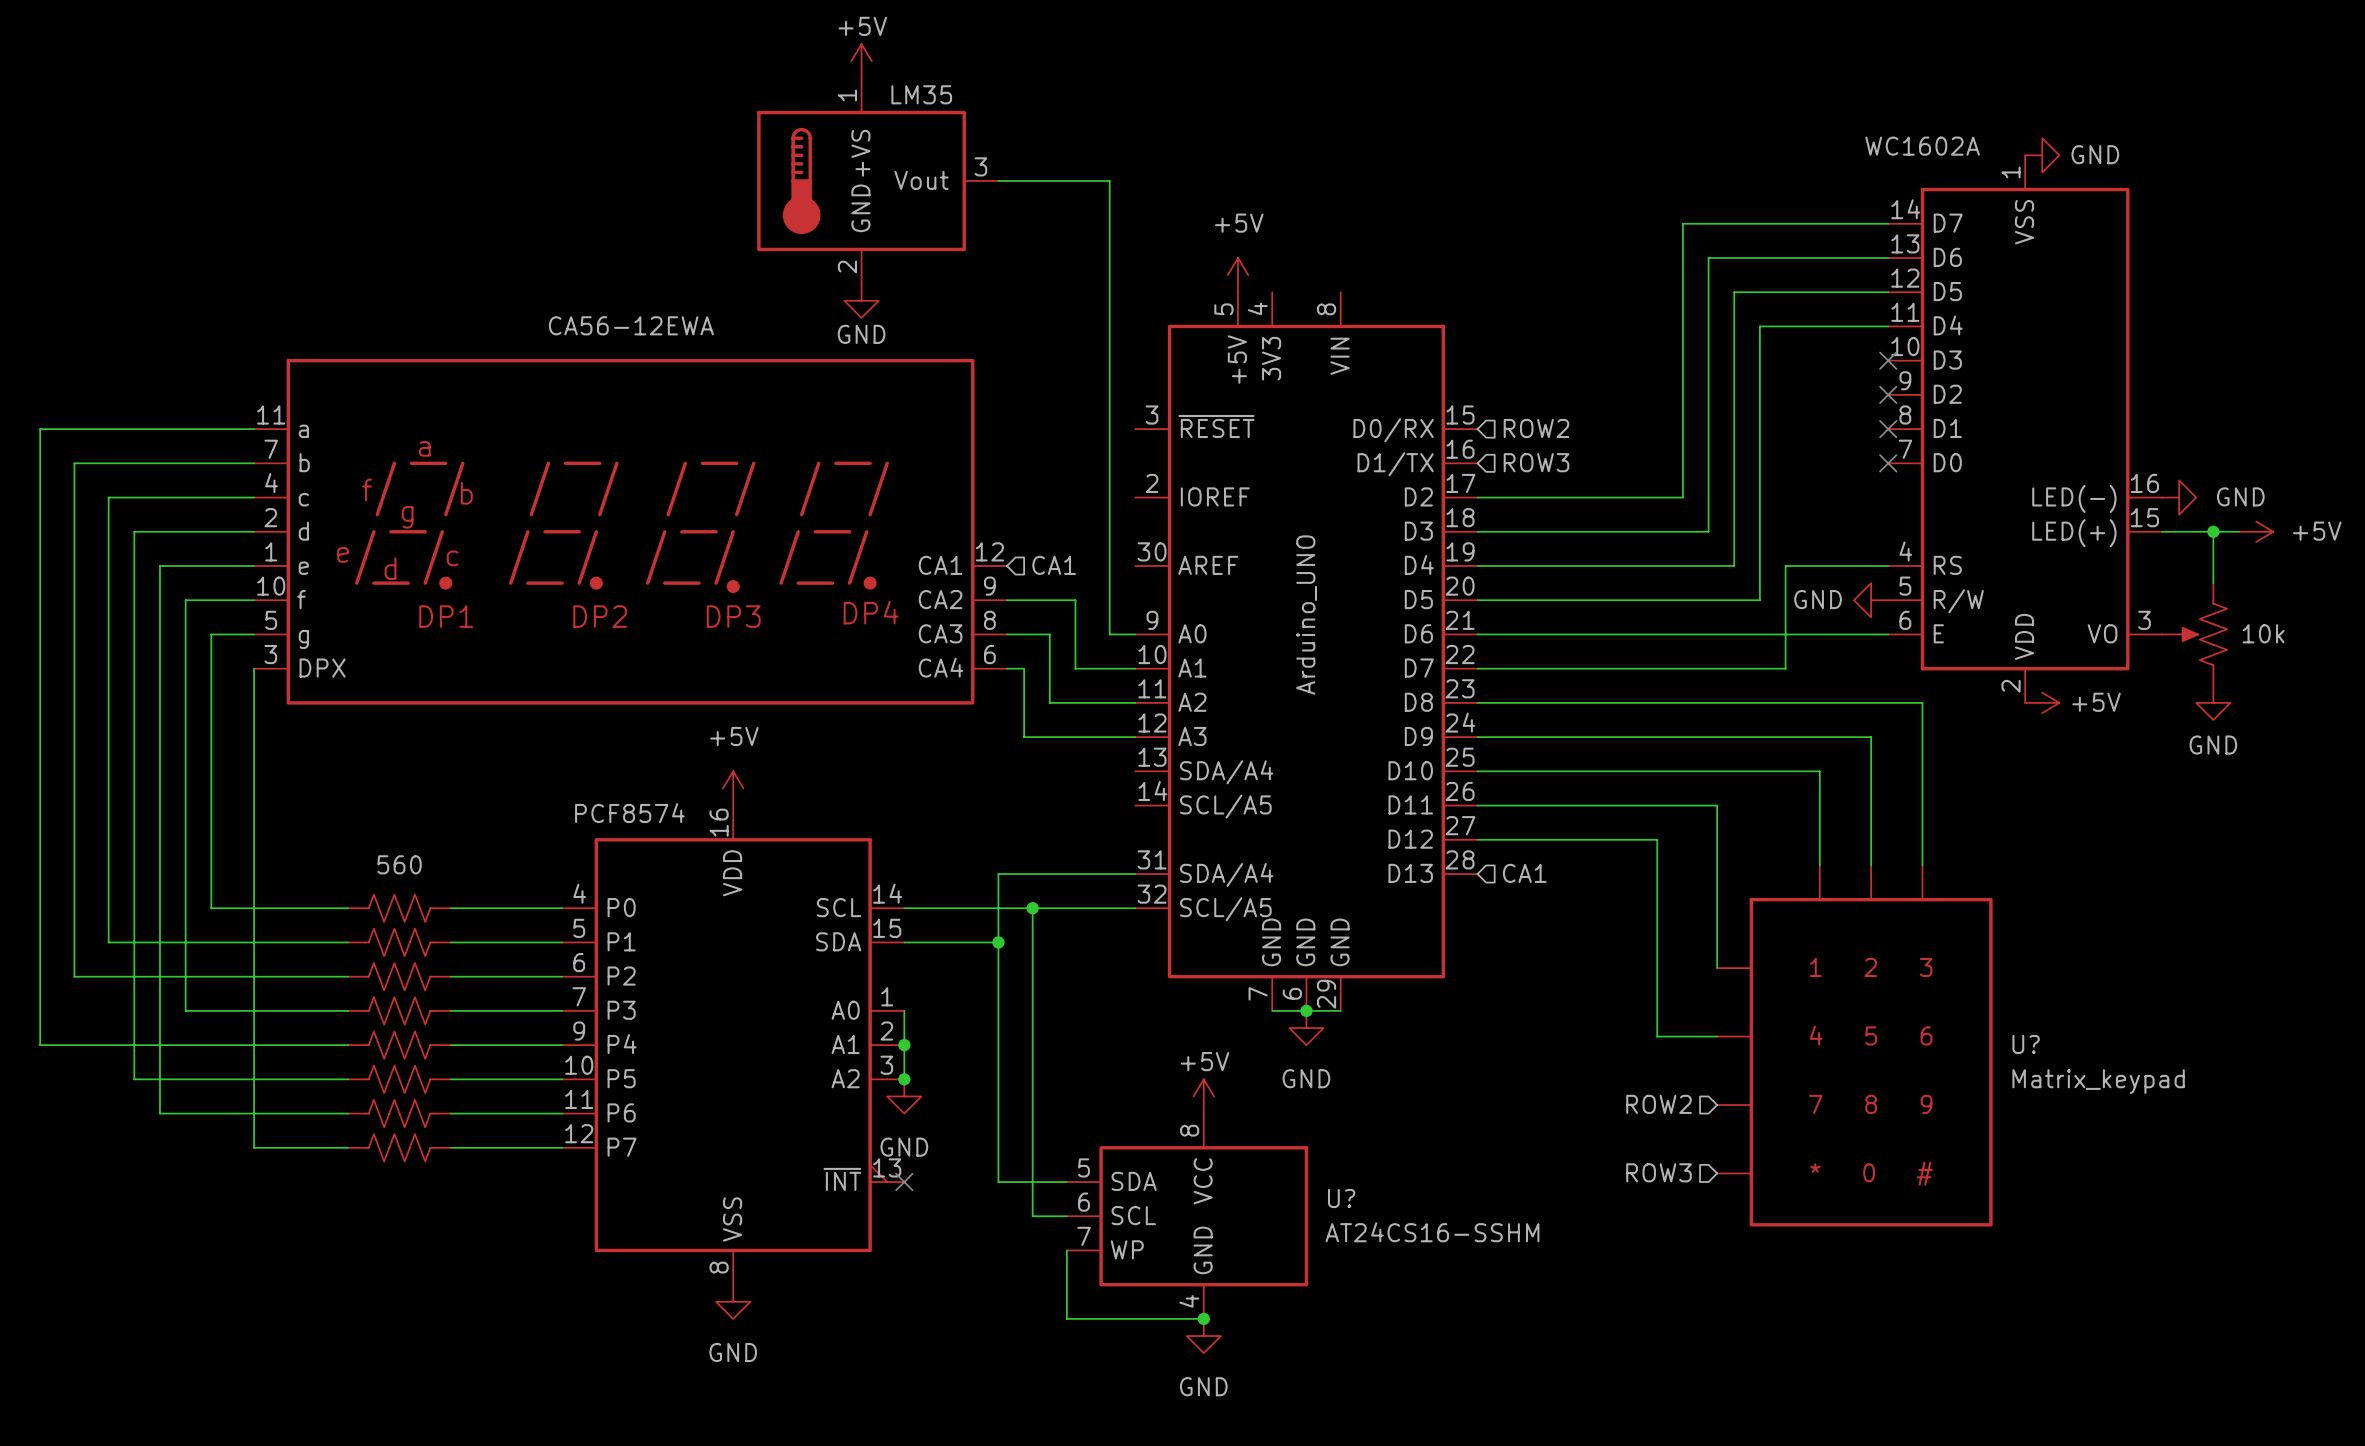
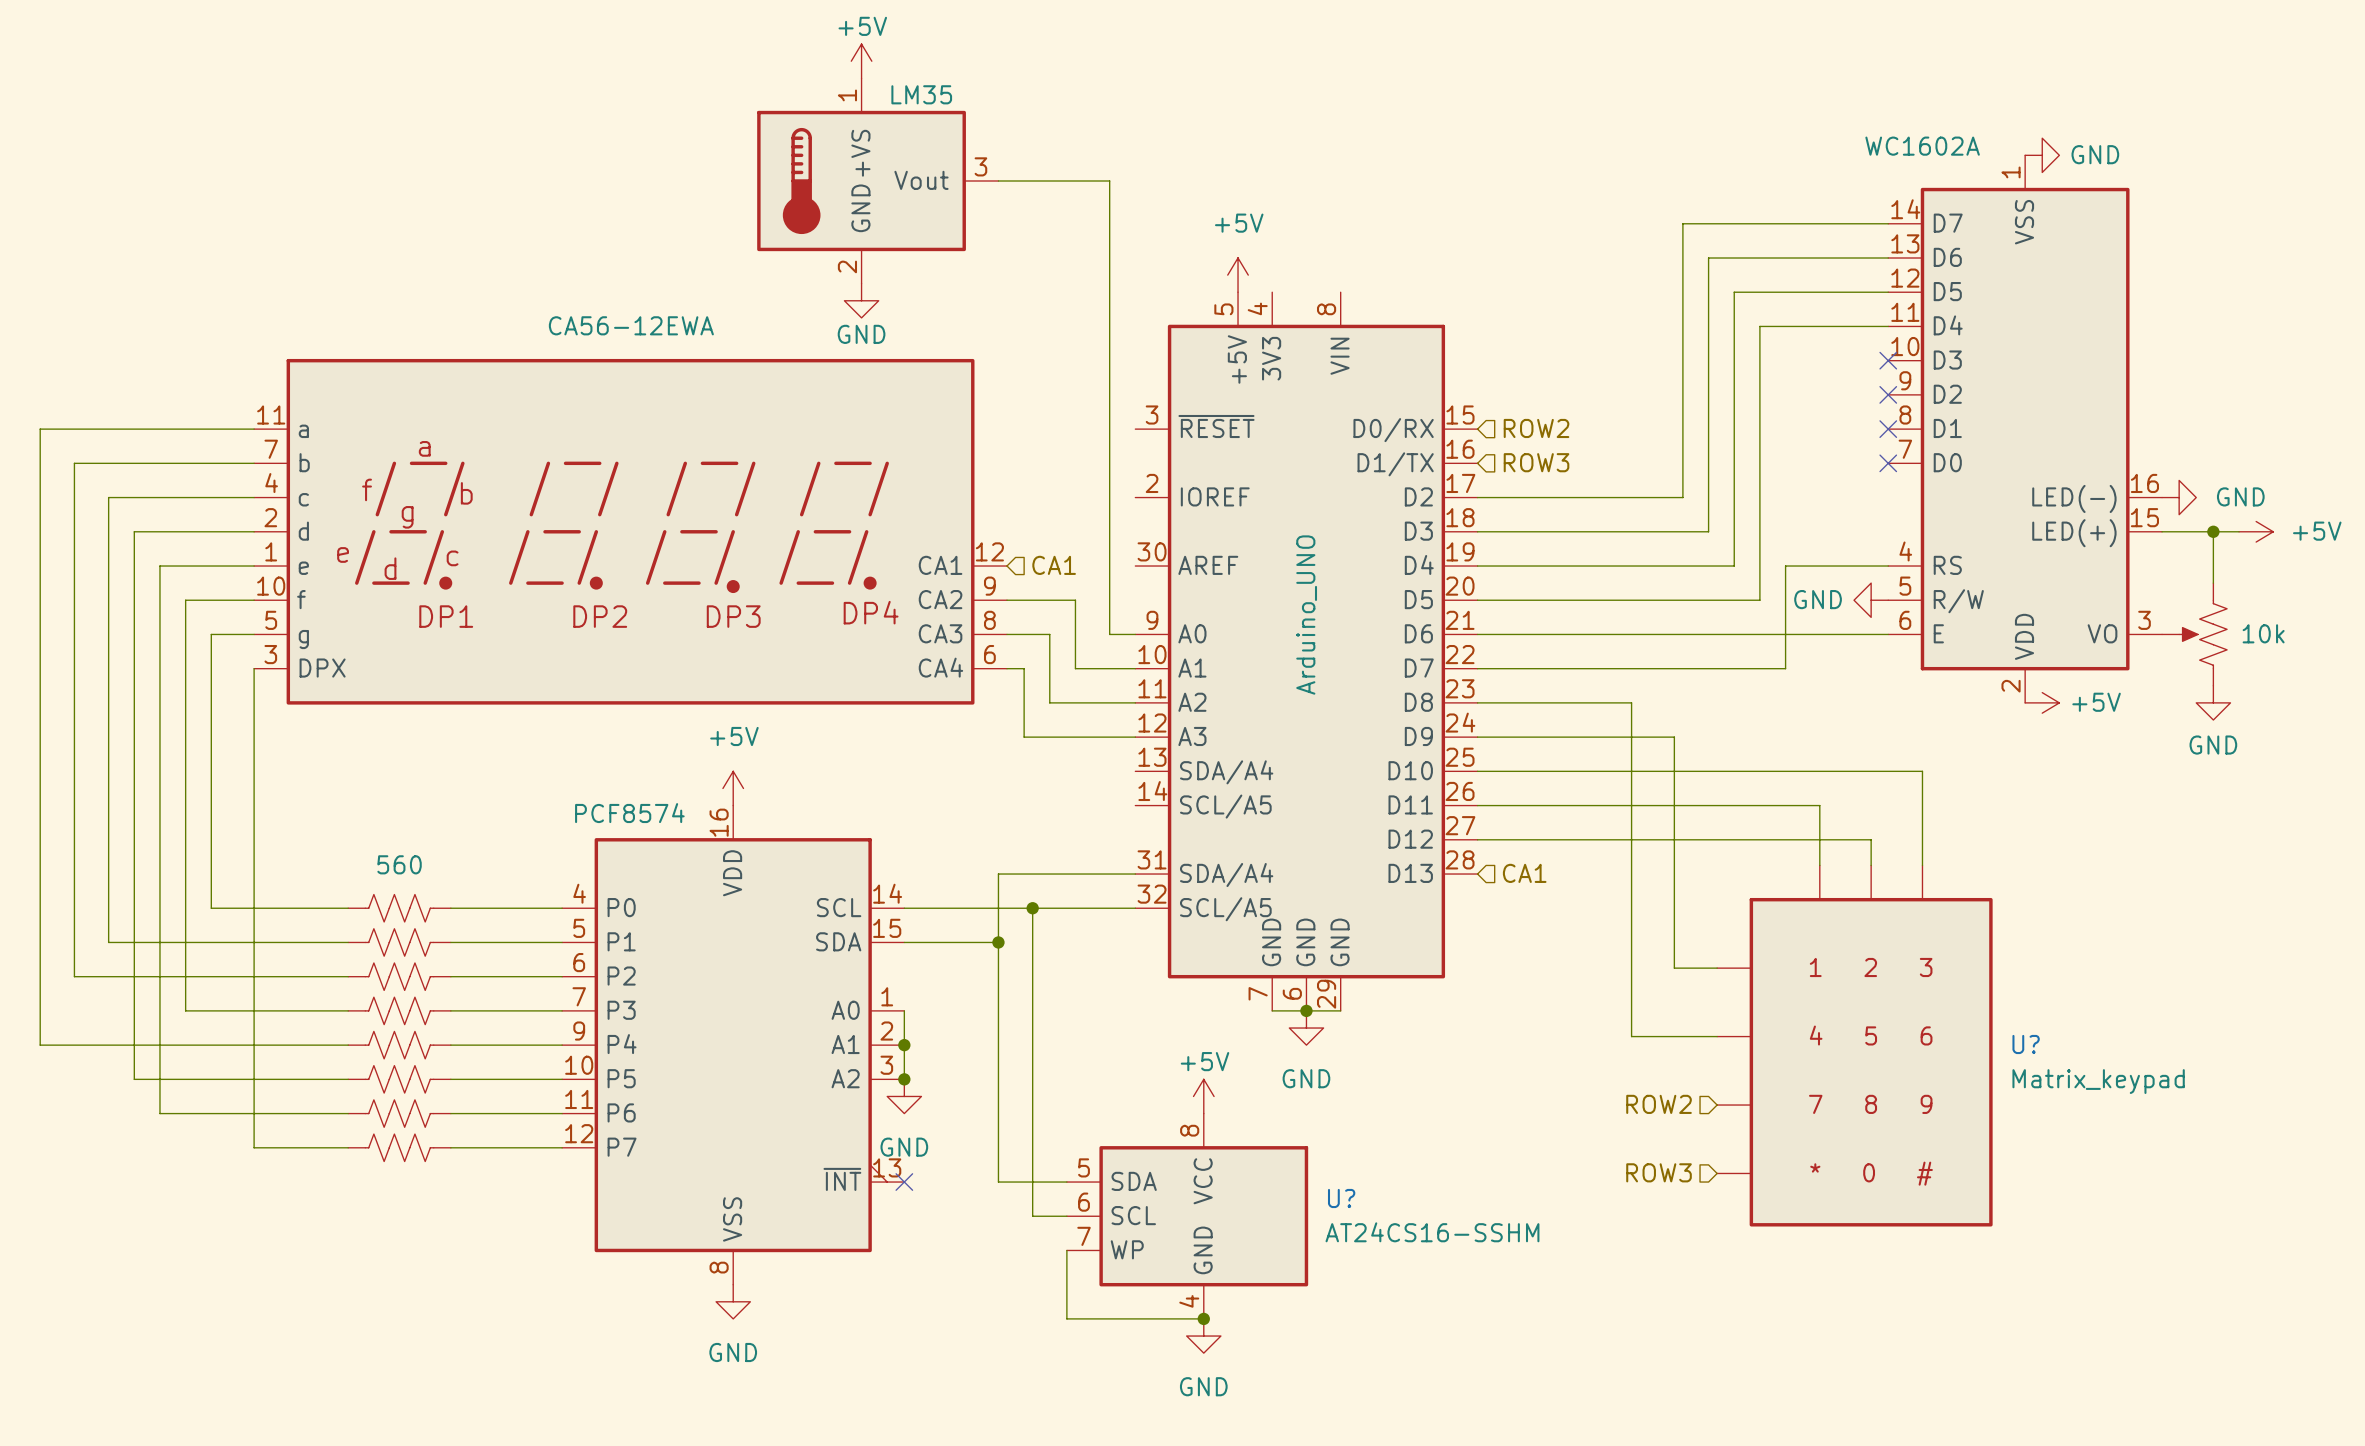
wire: (1631, 702) (1922, 702) (1922, 771) -> (1819, 771) (1922, 771)
wire: (1674, 737) (1871, 737) (1871, 839) -> (1657, 839) (1871, 839)
wire: (1819, 771) (1819, 805) -> (1717, 805) (1819, 805)
wire: (1717, 805) (1717, 968) -> (1674, 737) (1674, 968) (1717, 968)
wire: (1657, 839) (1657, 1036) -> (1631, 702) (1631, 1036) (1657, 1036)

